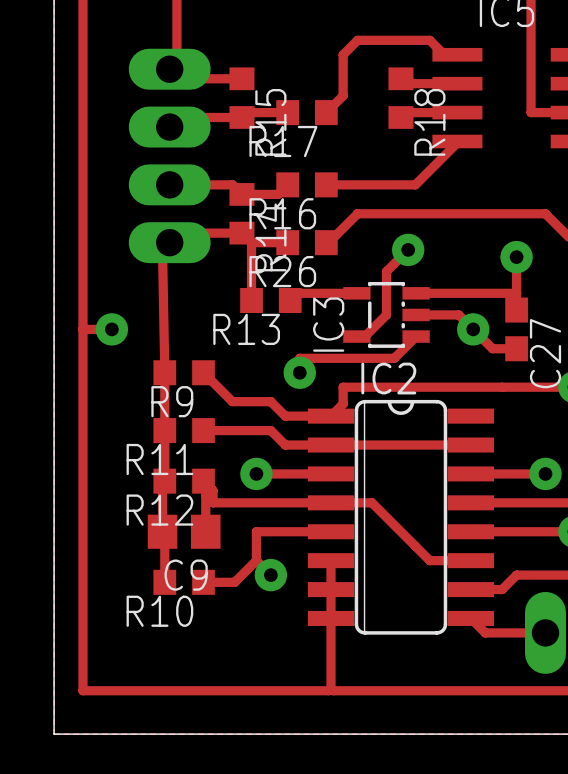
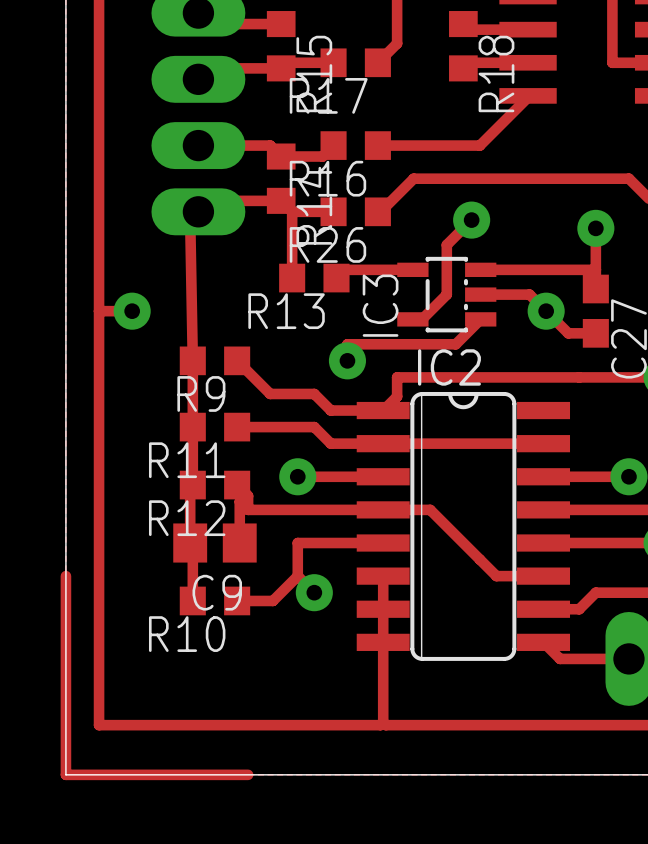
track: none -> (65, 576) (65, 774) (248, 774)

